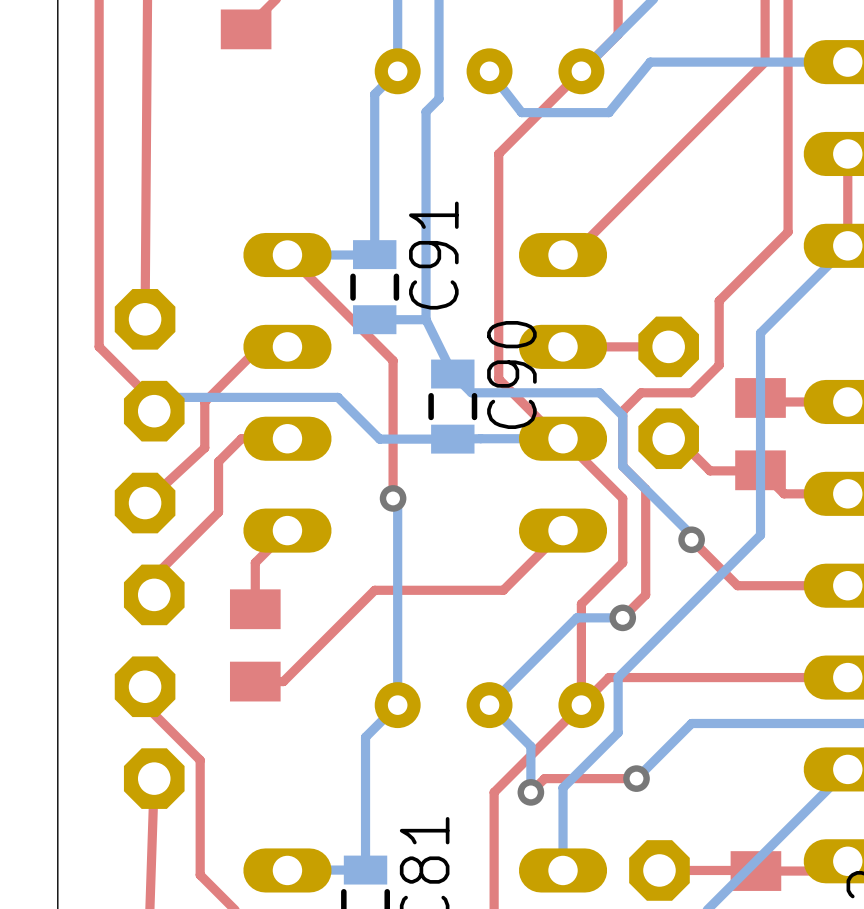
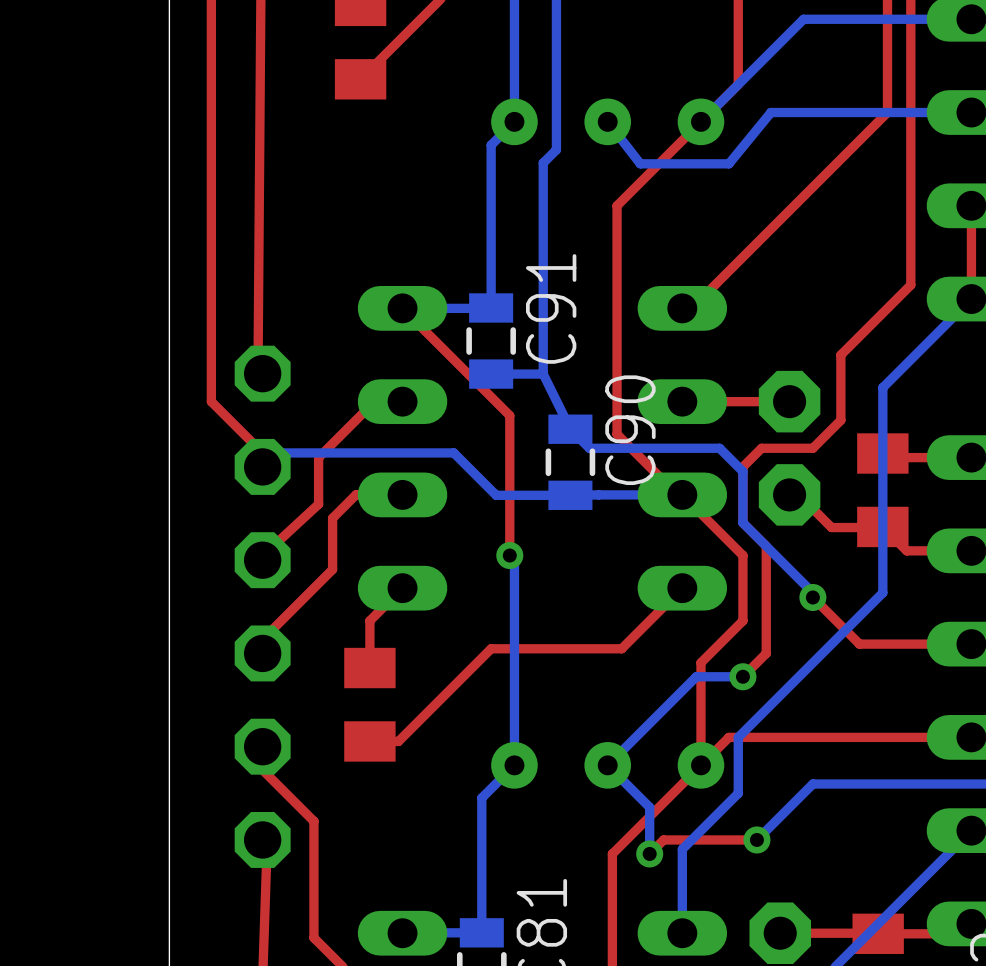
part footprint: [114, 289, 185, 809] -> [234, 345, 291, 868]

